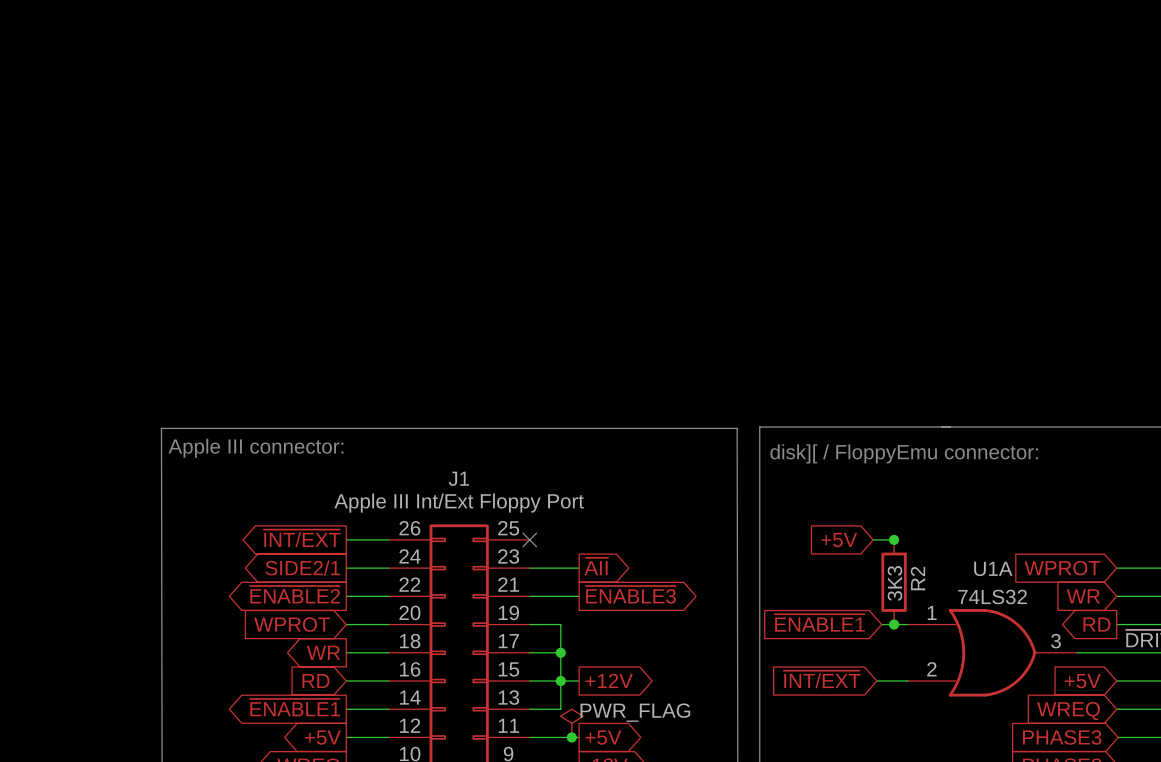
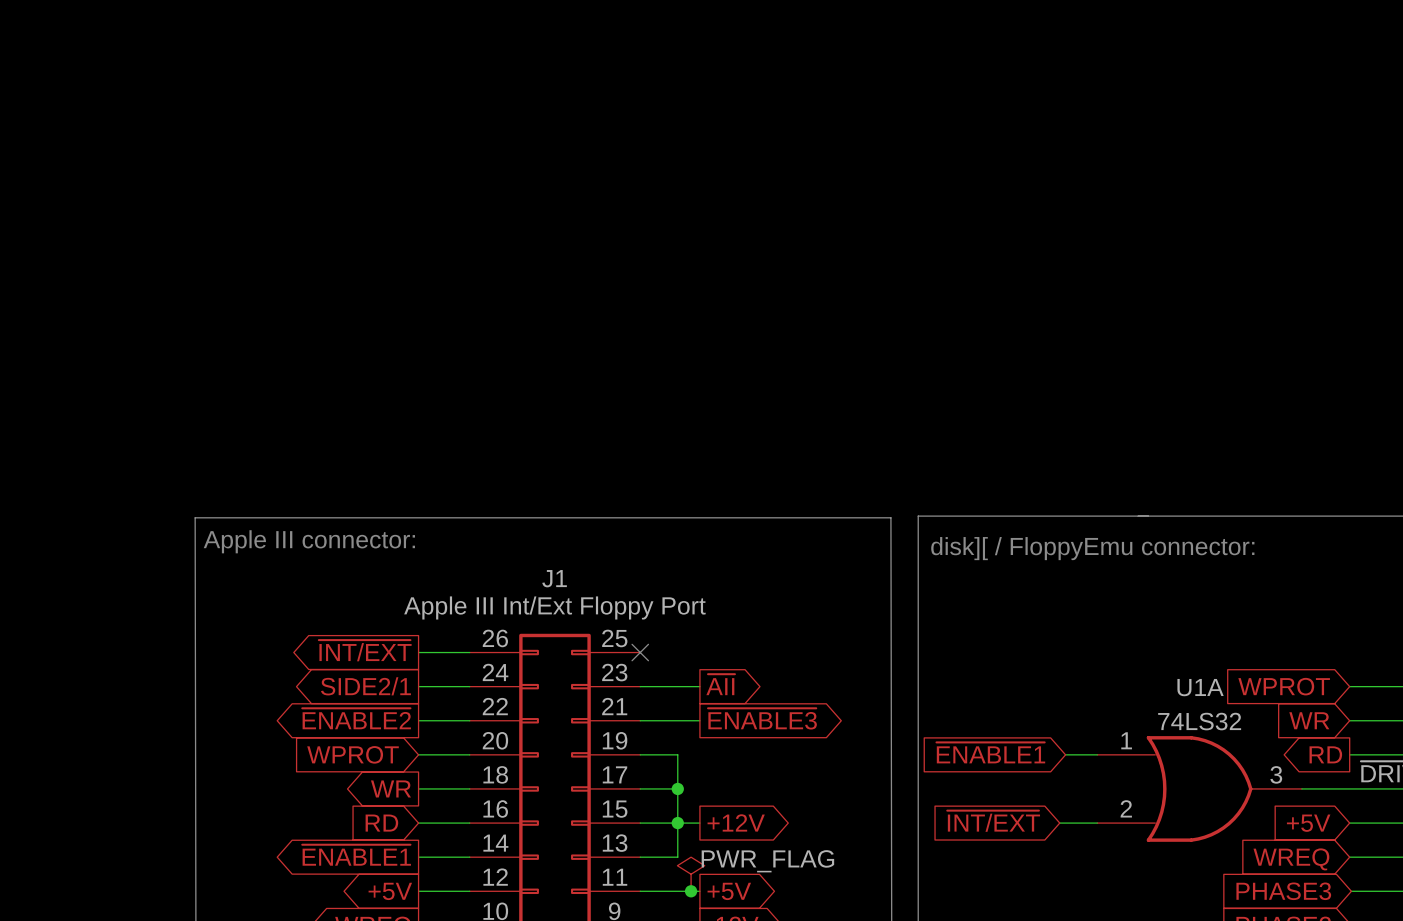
wire: (873, 539) (894, 540) -> none
junction: (894, 539) -> none
global label: +5V (839, 540) -> none
R2: 3K3 (894, 582) -> none
junction: (894, 624) -> none

